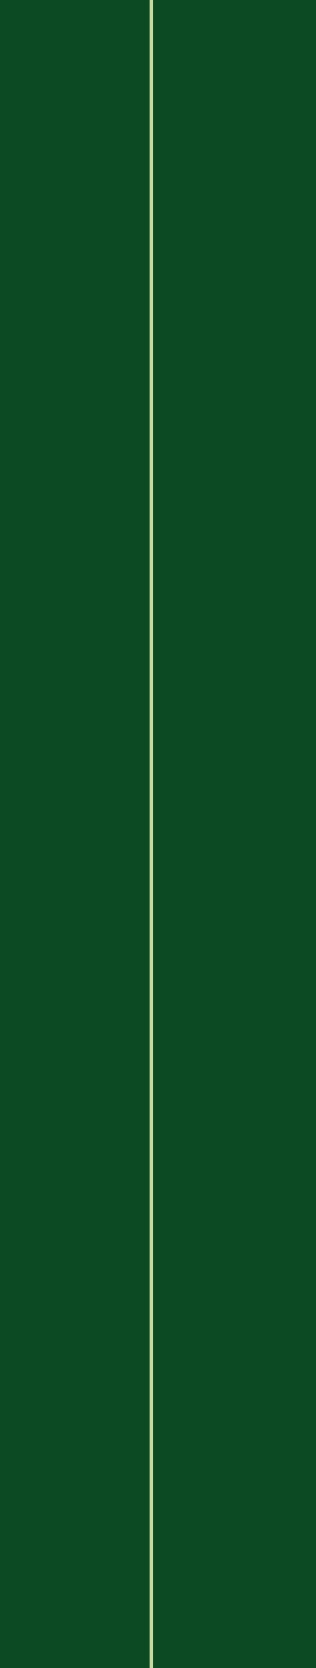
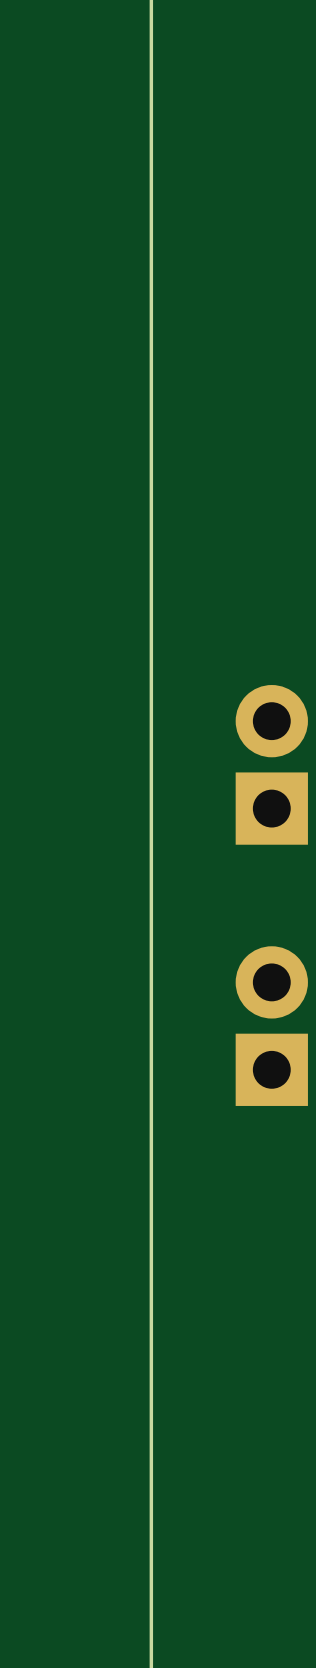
part: none -> (271, 764)
part: none -> (271, 1026)

